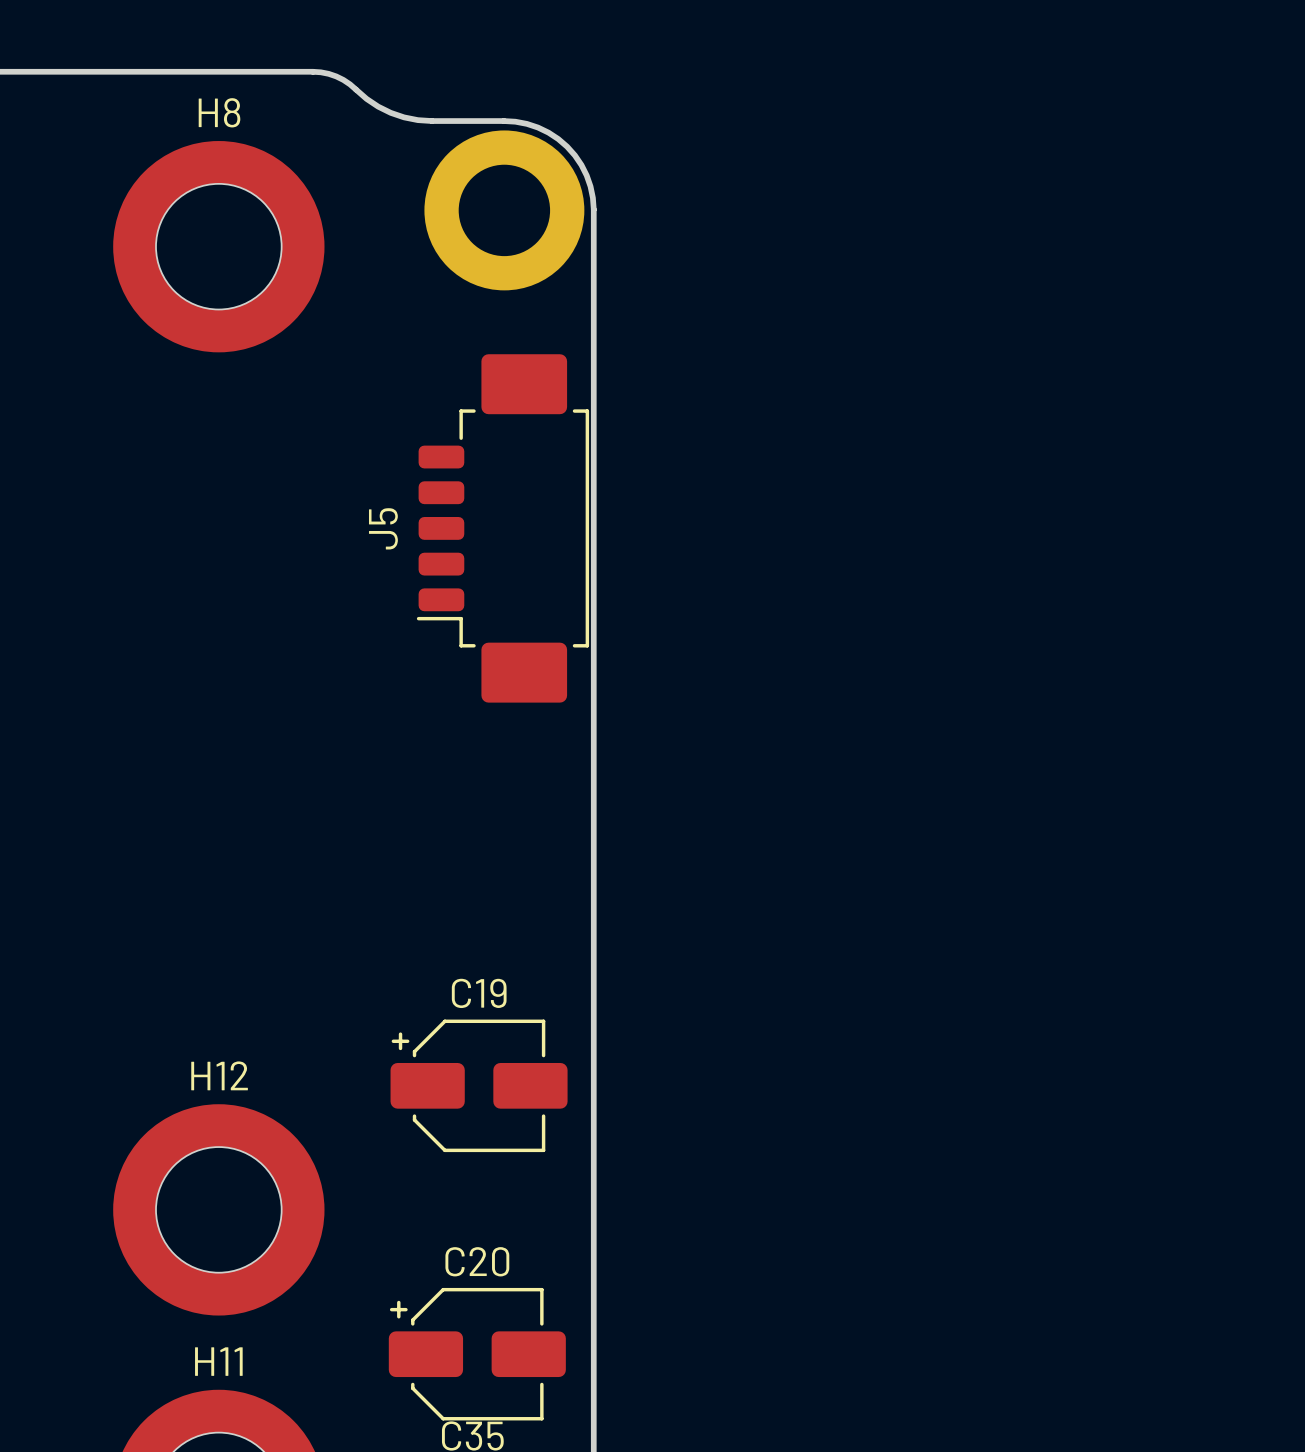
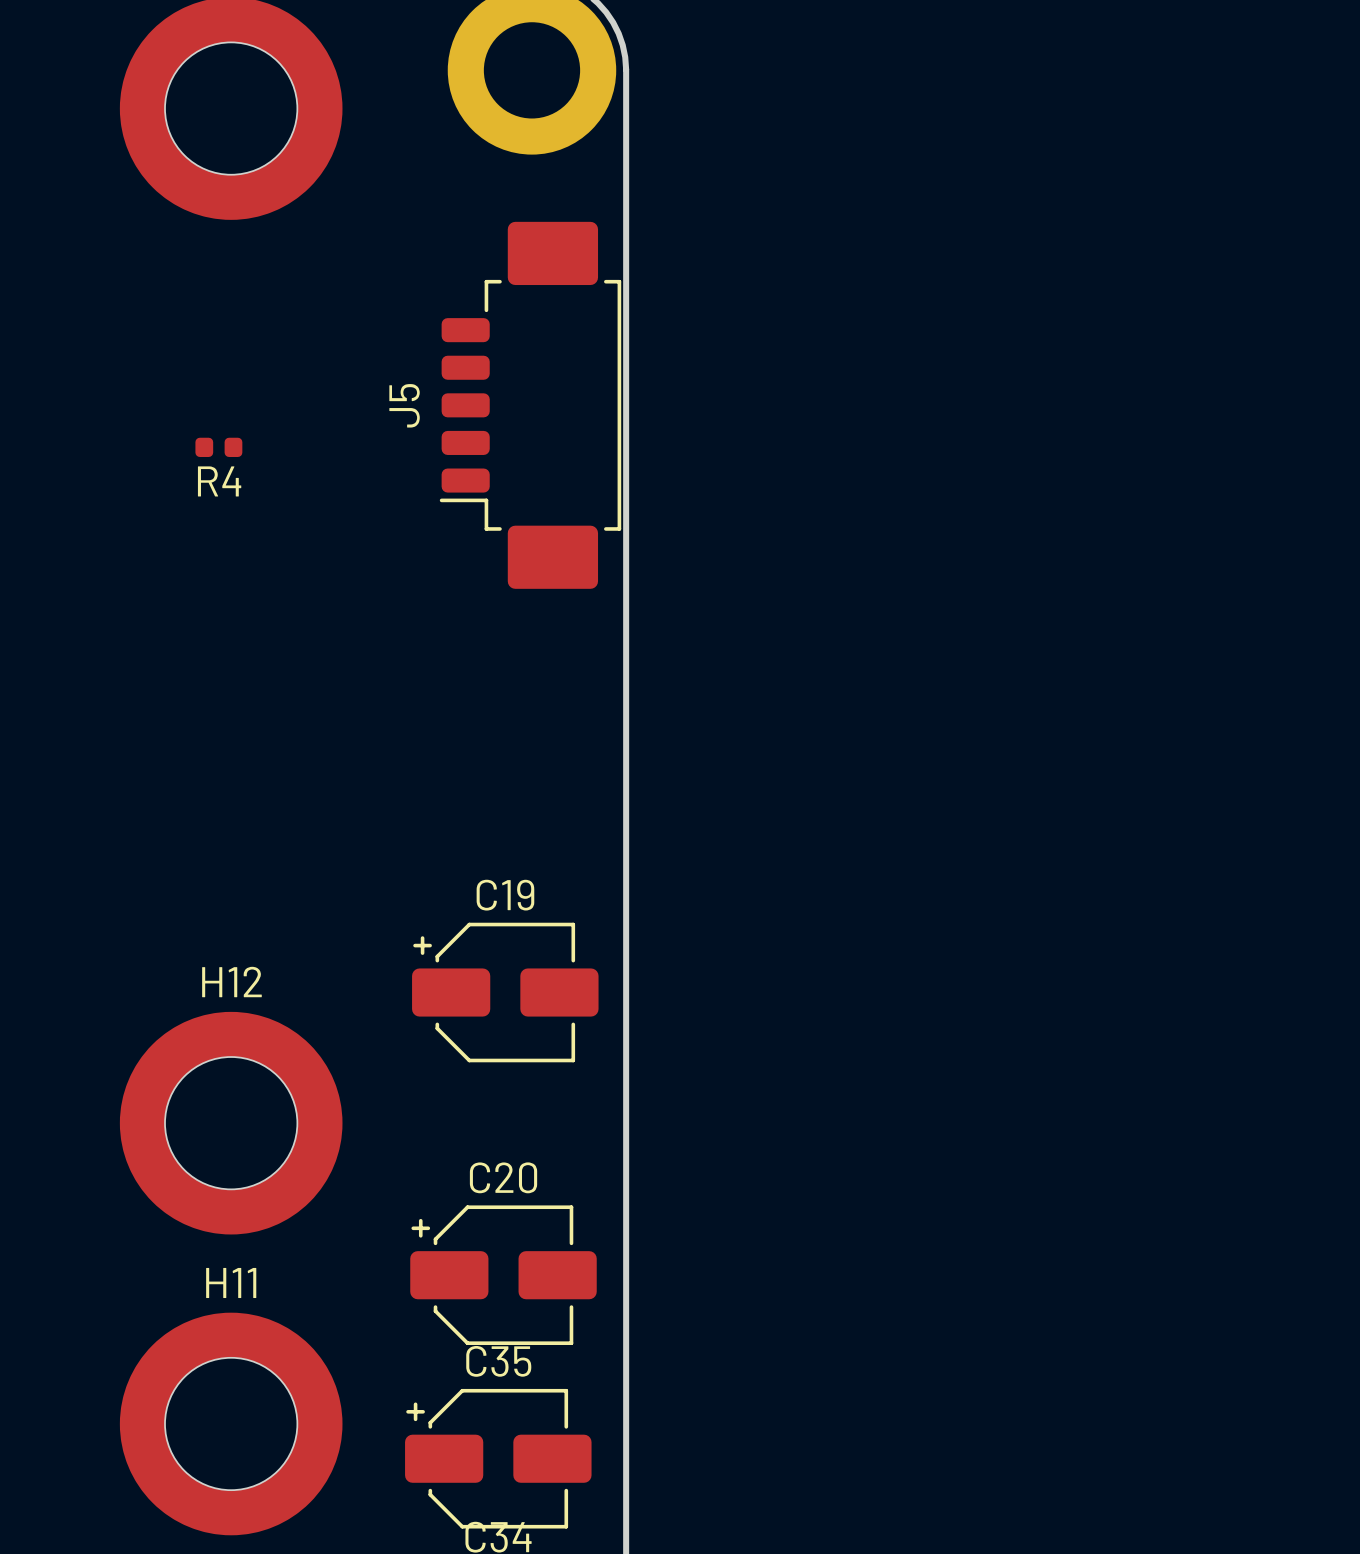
R4: none -> (218, 447)

